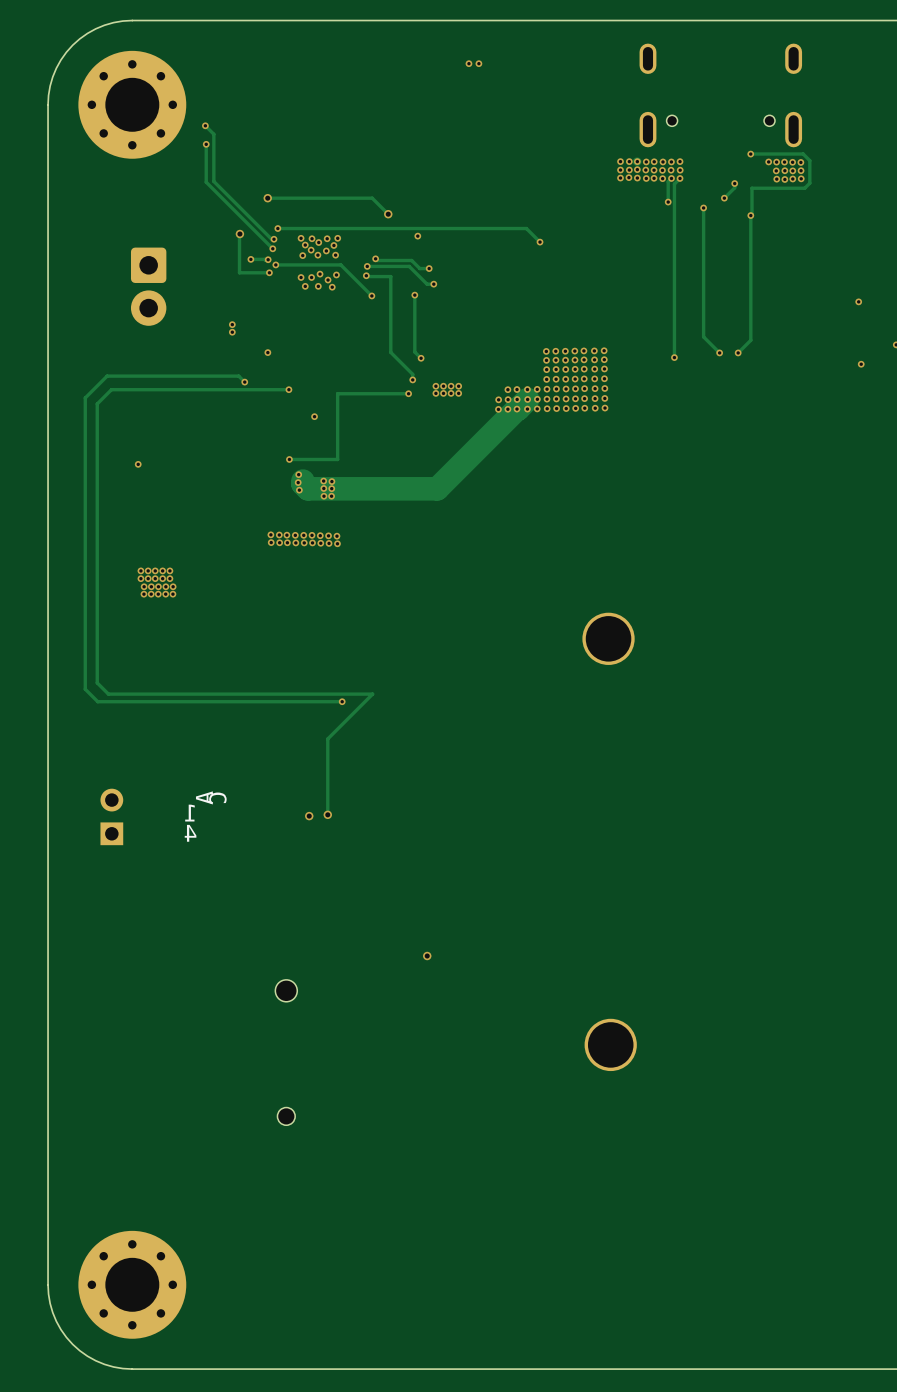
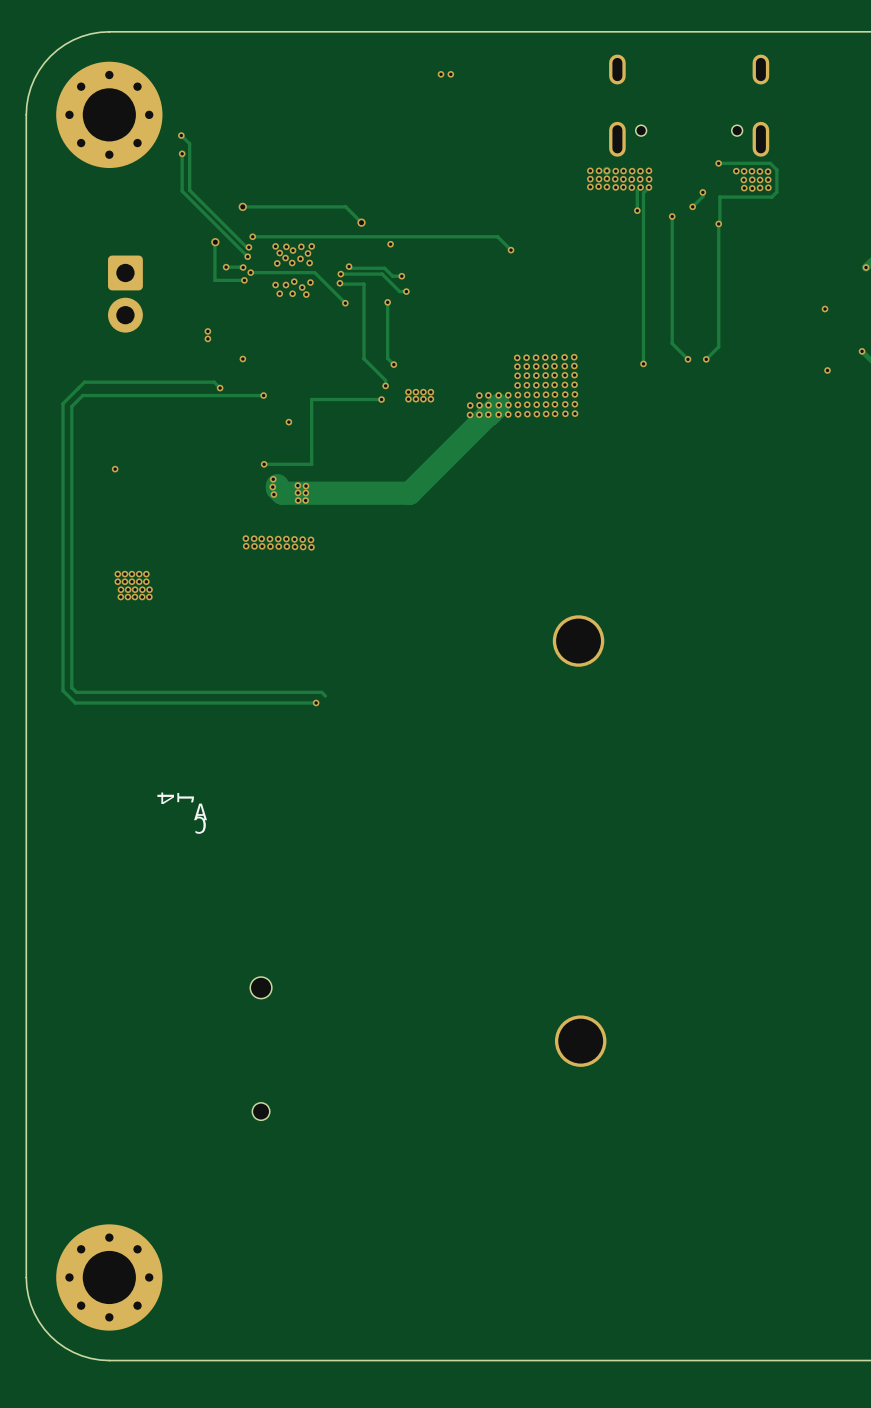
track: (111, 389) (97, 403) (97, 682) (108, 694) (372, 694) (327, 738) (327, 814) -> (88, 395) (82, 395) (71, 406) (71, 687) (76, 692) (321, 692) (325, 696)
via: (327, 814) -> none
part: (111, 816) -> none
part rotation: 0° (205, 816) -> 90° clockwise (182, 813)
via: (309, 816) -> none
via: (427, 956) -> none

